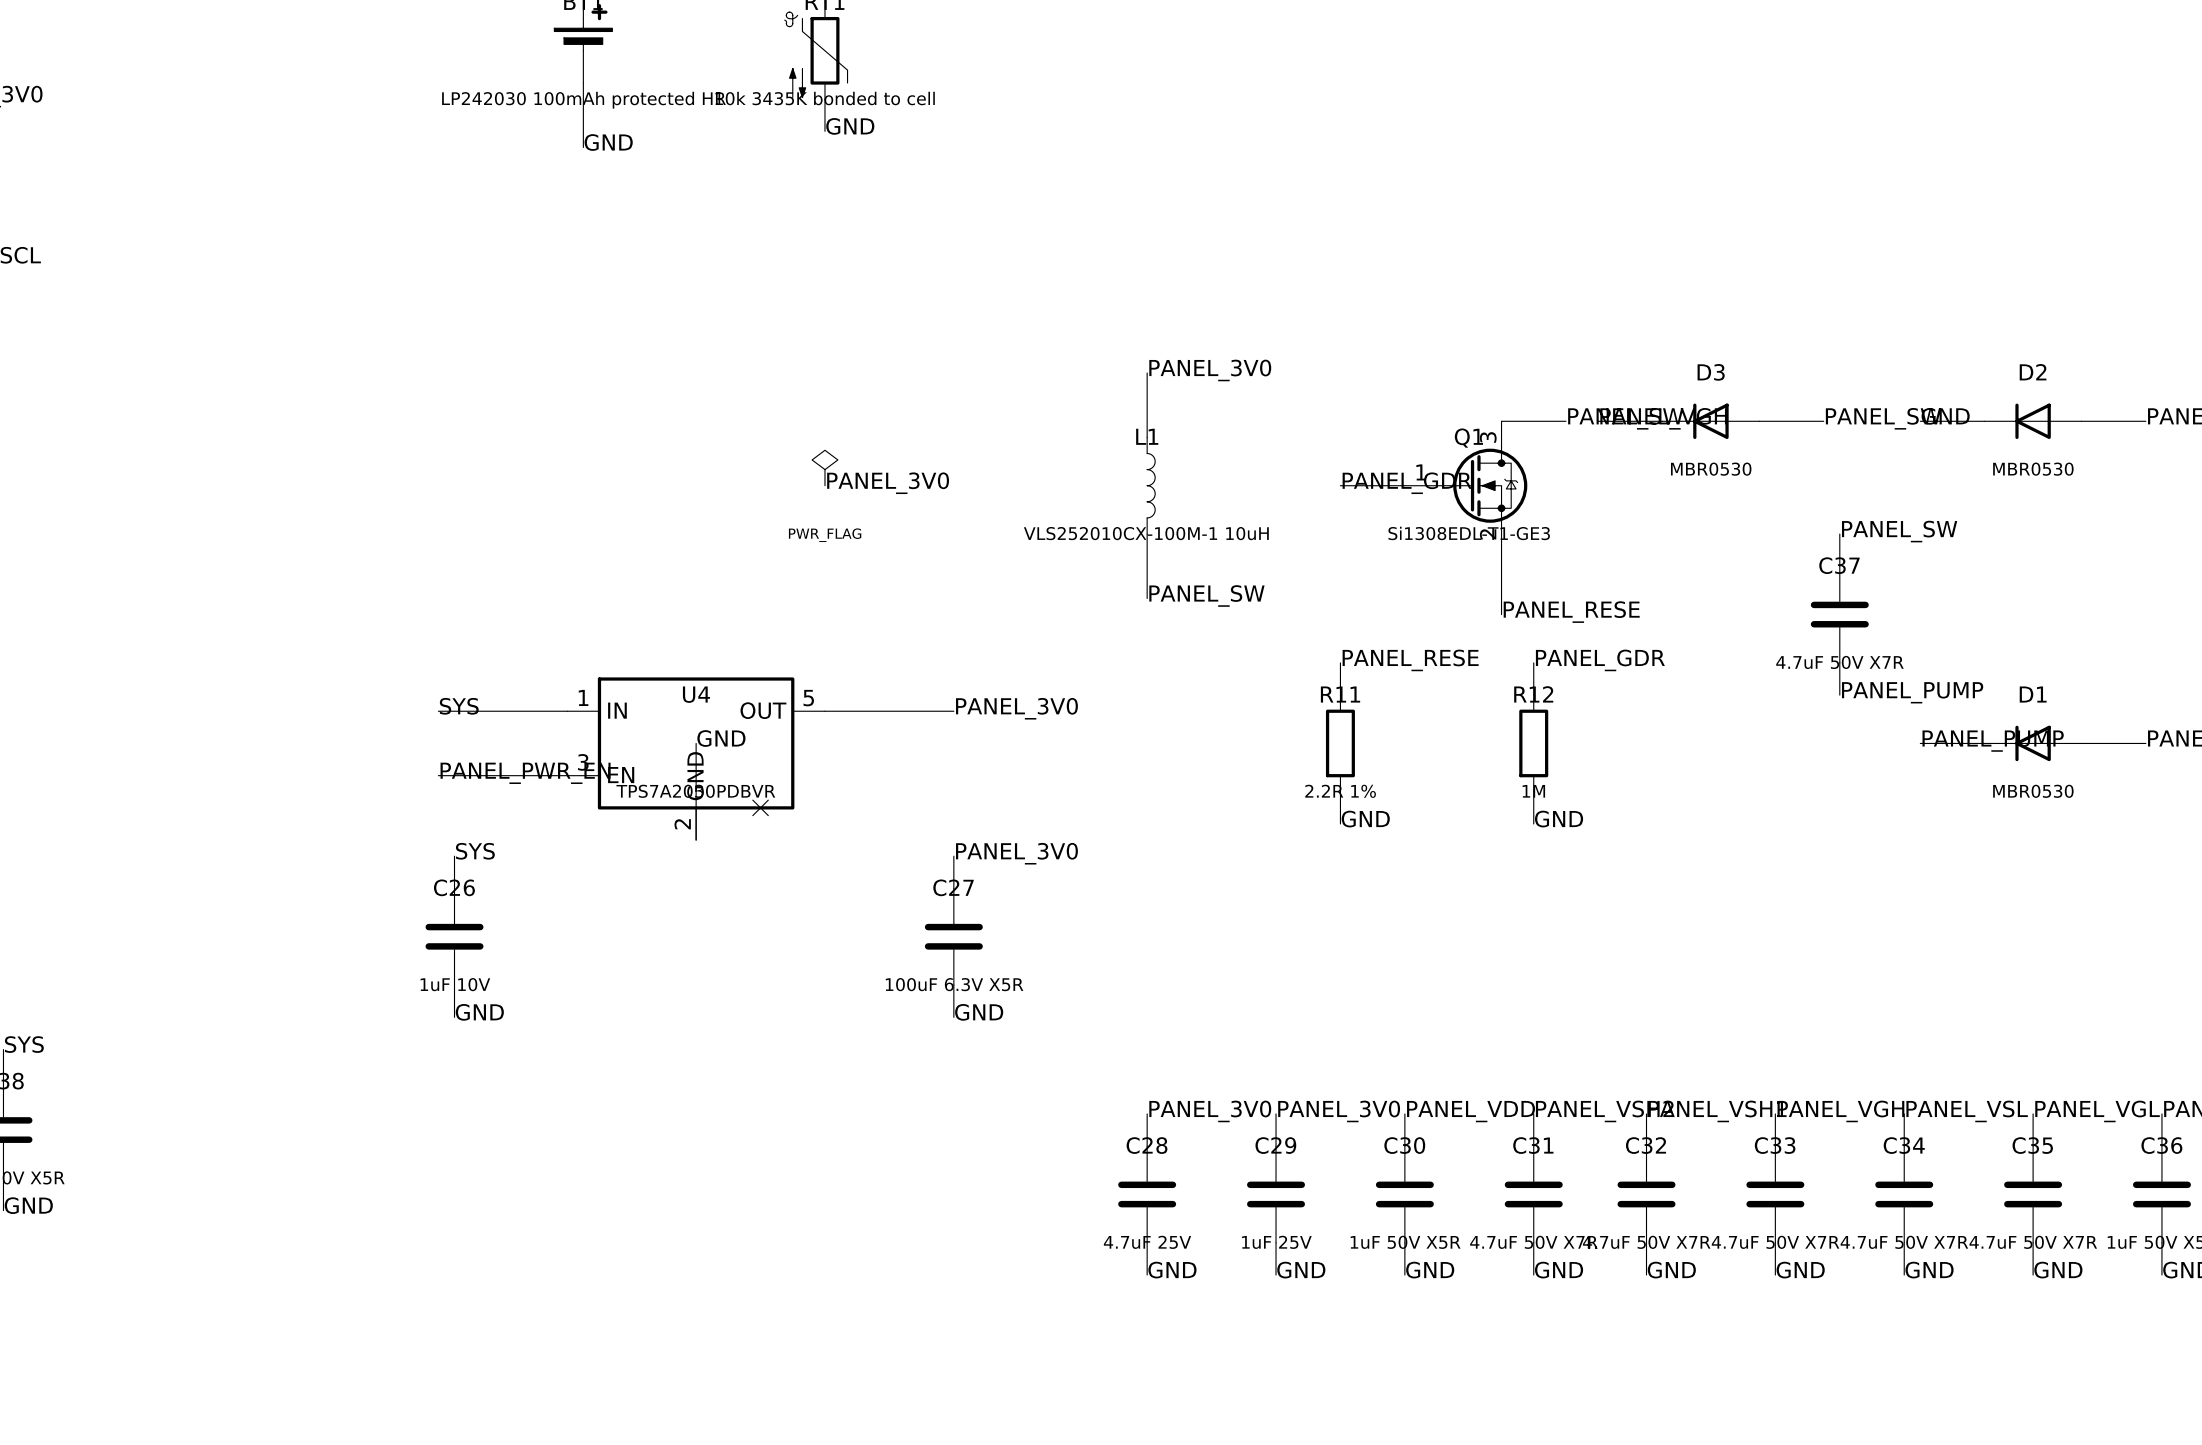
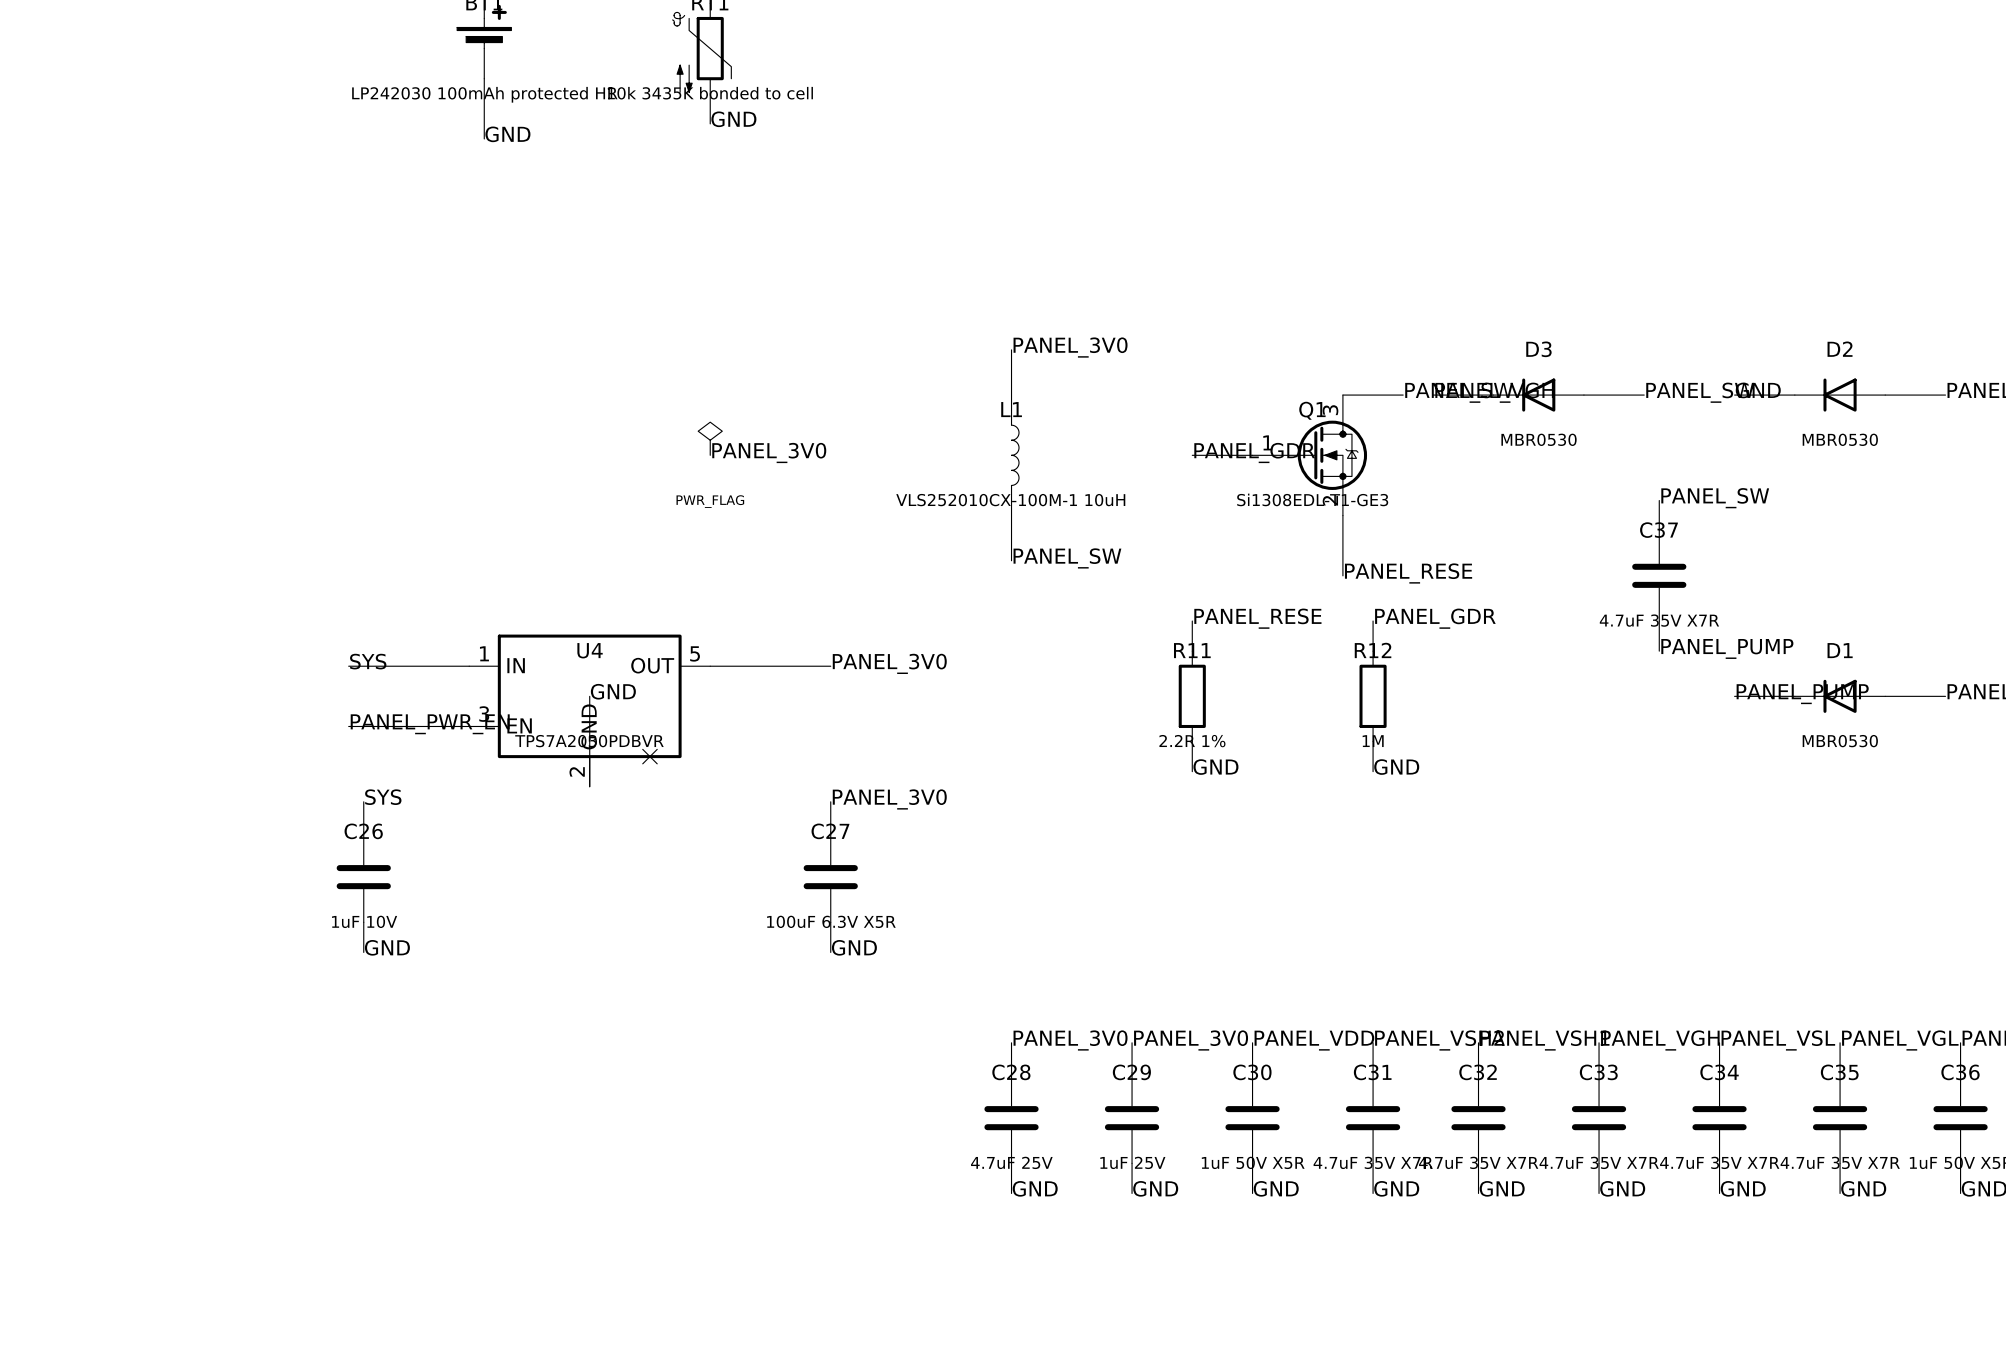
C37 value: 4.7uF 50V X7R (1839, 662) -> 4.7uF 35V X7R (1659, 620)
C31 value: 4.7uF 50V X7R (1533, 1242) -> 4.7uF 35V X7R (1373, 1162)
C32 value: 4.7uF 50V X7R (1646, 1242) -> 4.7uF 35V X7R (1478, 1162)
C33 value: 4.7uF 50V X7R (1775, 1242) -> 4.7uF 35V X7R (1599, 1162)
C34 value: 4.7uF 50V X7R (1904, 1242) -> 4.7uF 35V X7R (1719, 1162)
C35 value: 4.7uF 50V X7R (2033, 1242) -> 4.7uF 35V X7R (1840, 1162)

